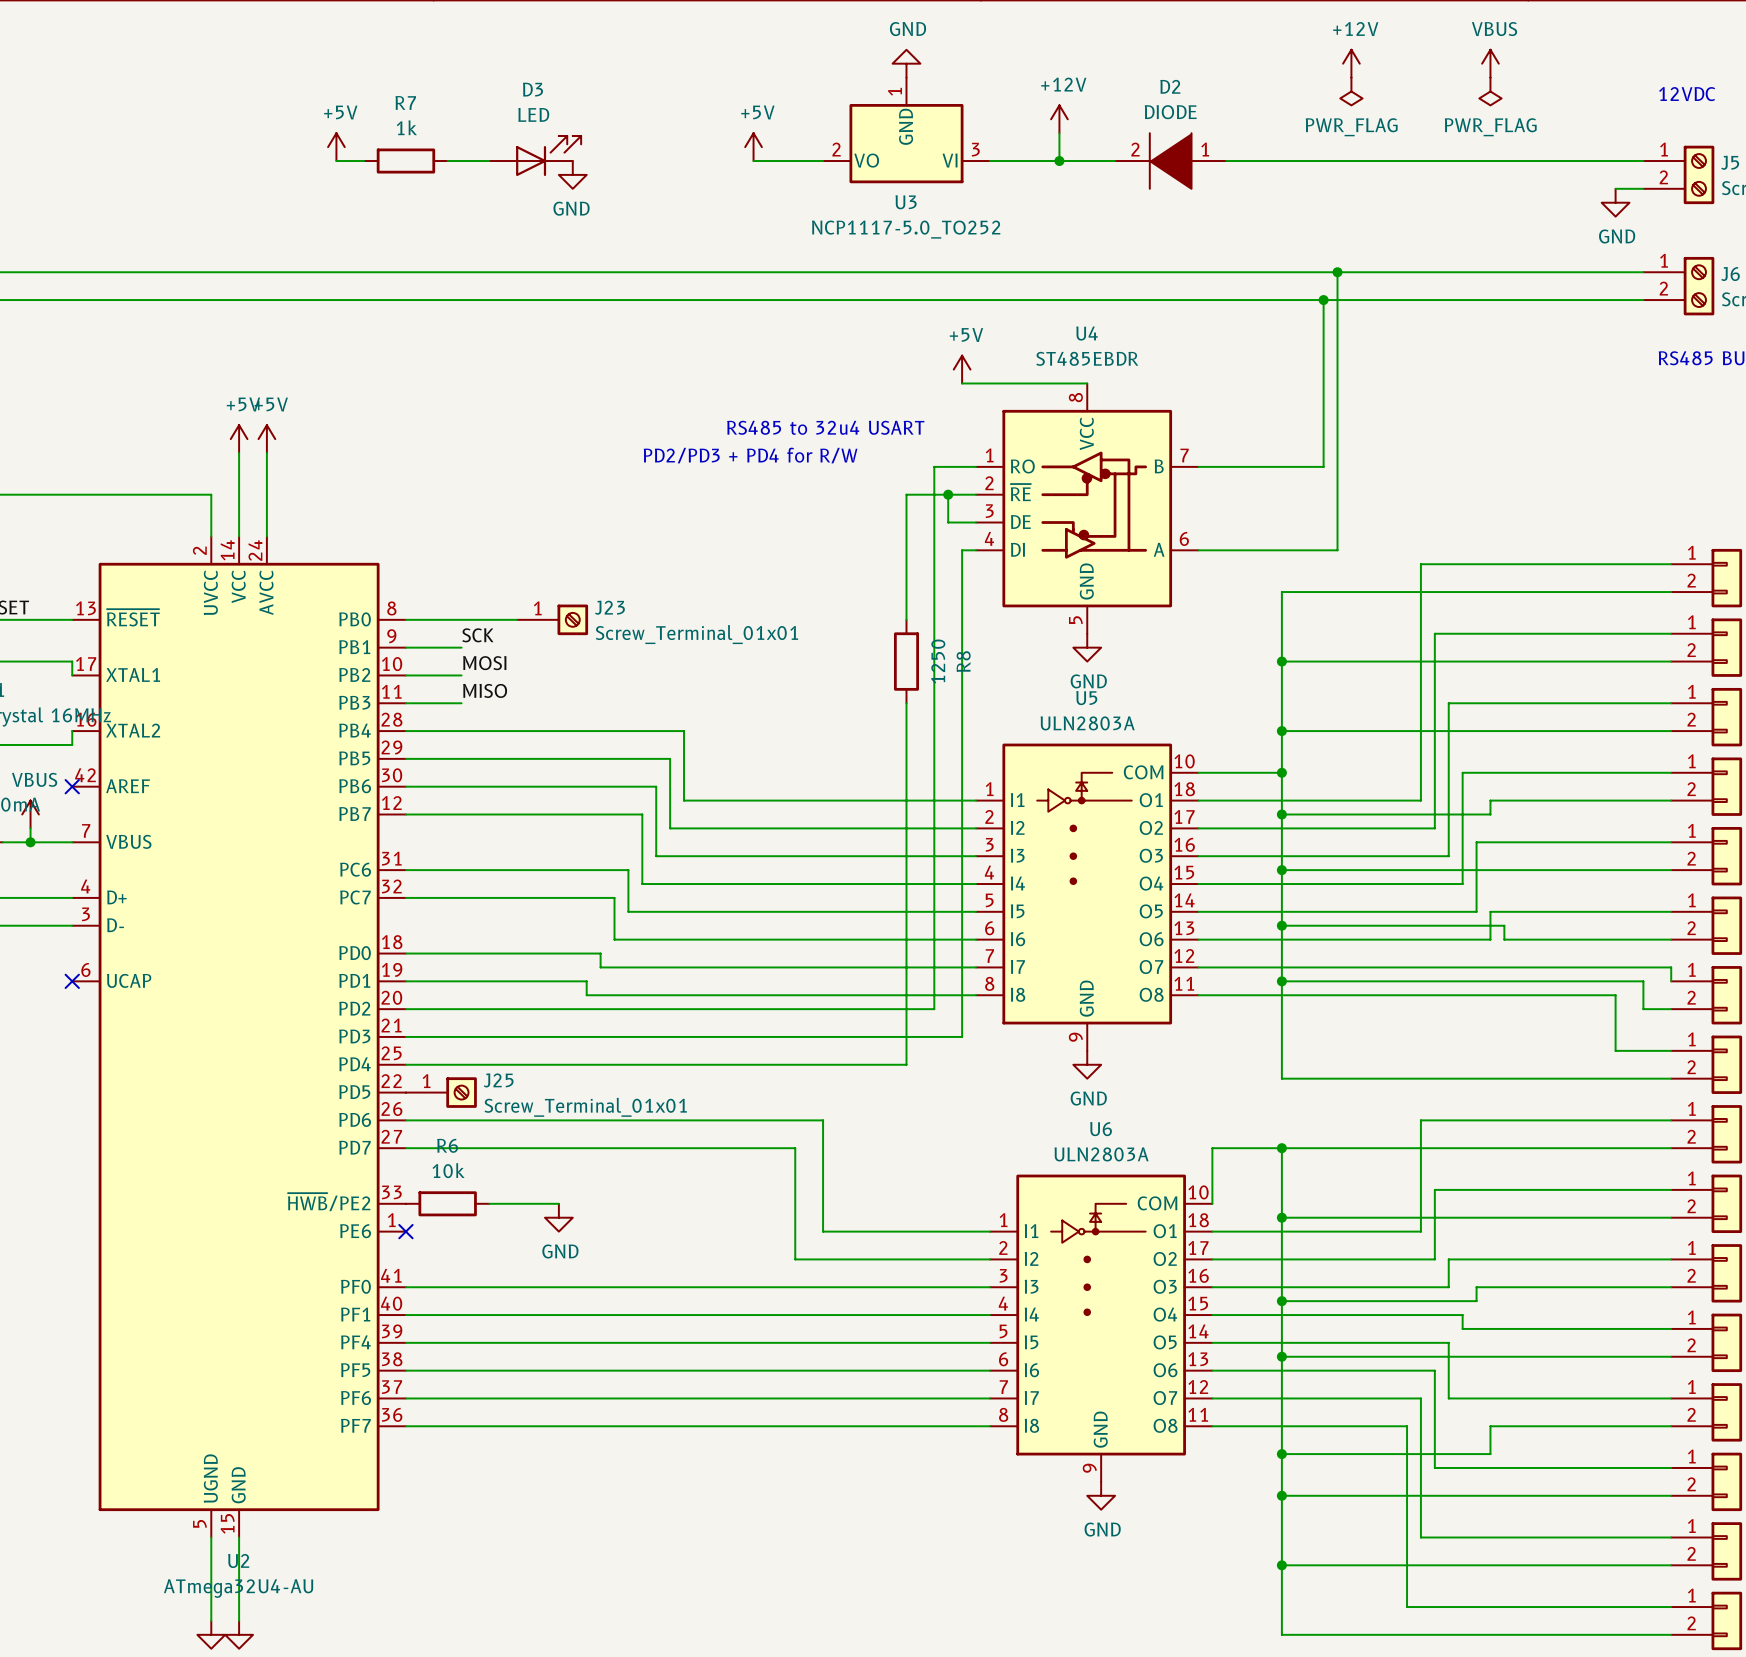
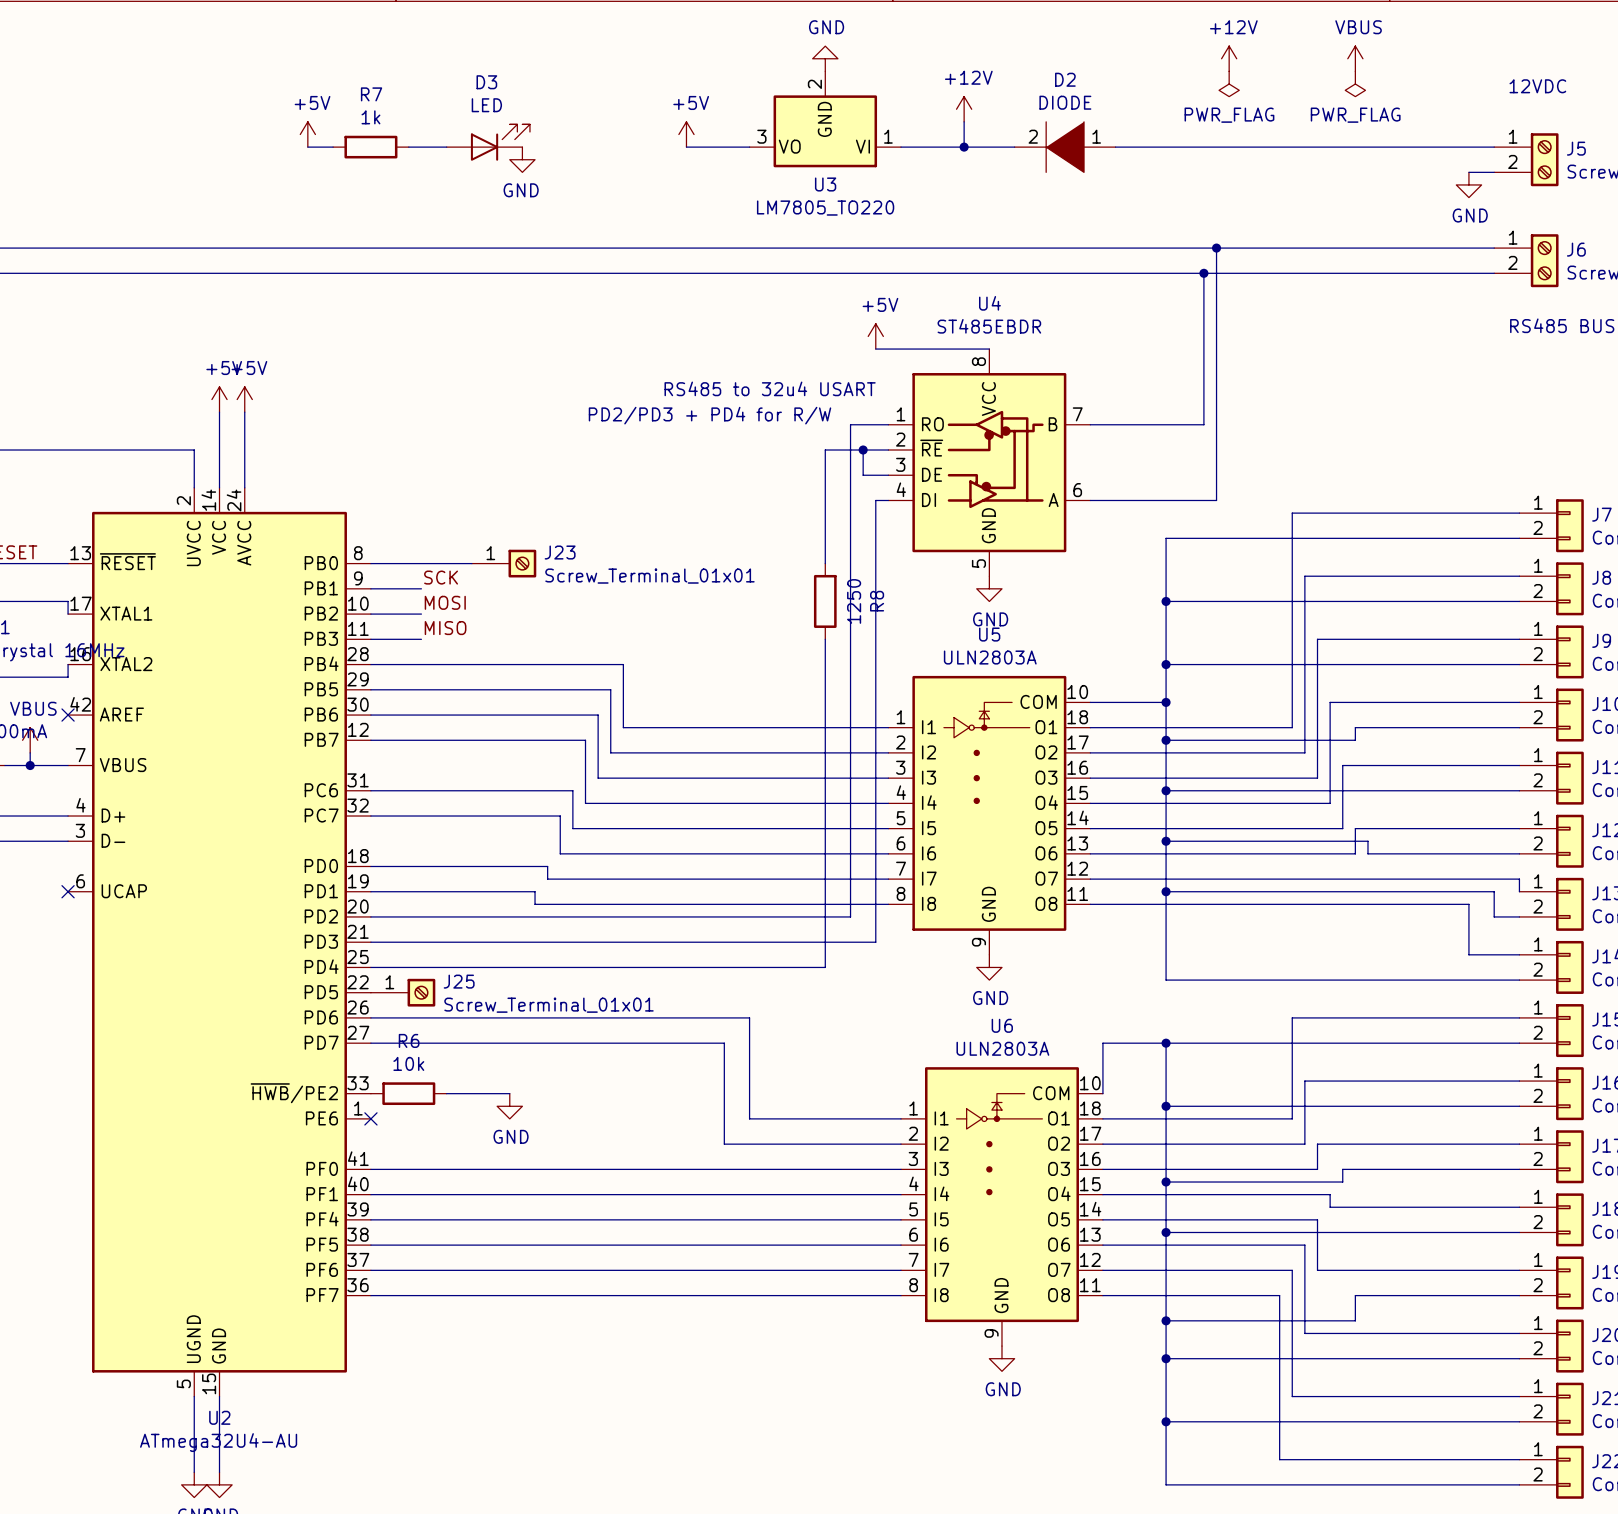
U3 pin number: 1 (895, 91) -> 2 (814, 84)
U3 pin number: 2 (836, 149) -> 3 (761, 136)
U3 pin number: 3 (975, 149) -> 1 (888, 136)
U3 value: NCP1117-5.0_TO252 (906, 229) -> LM7805_TO220 (825, 208)

